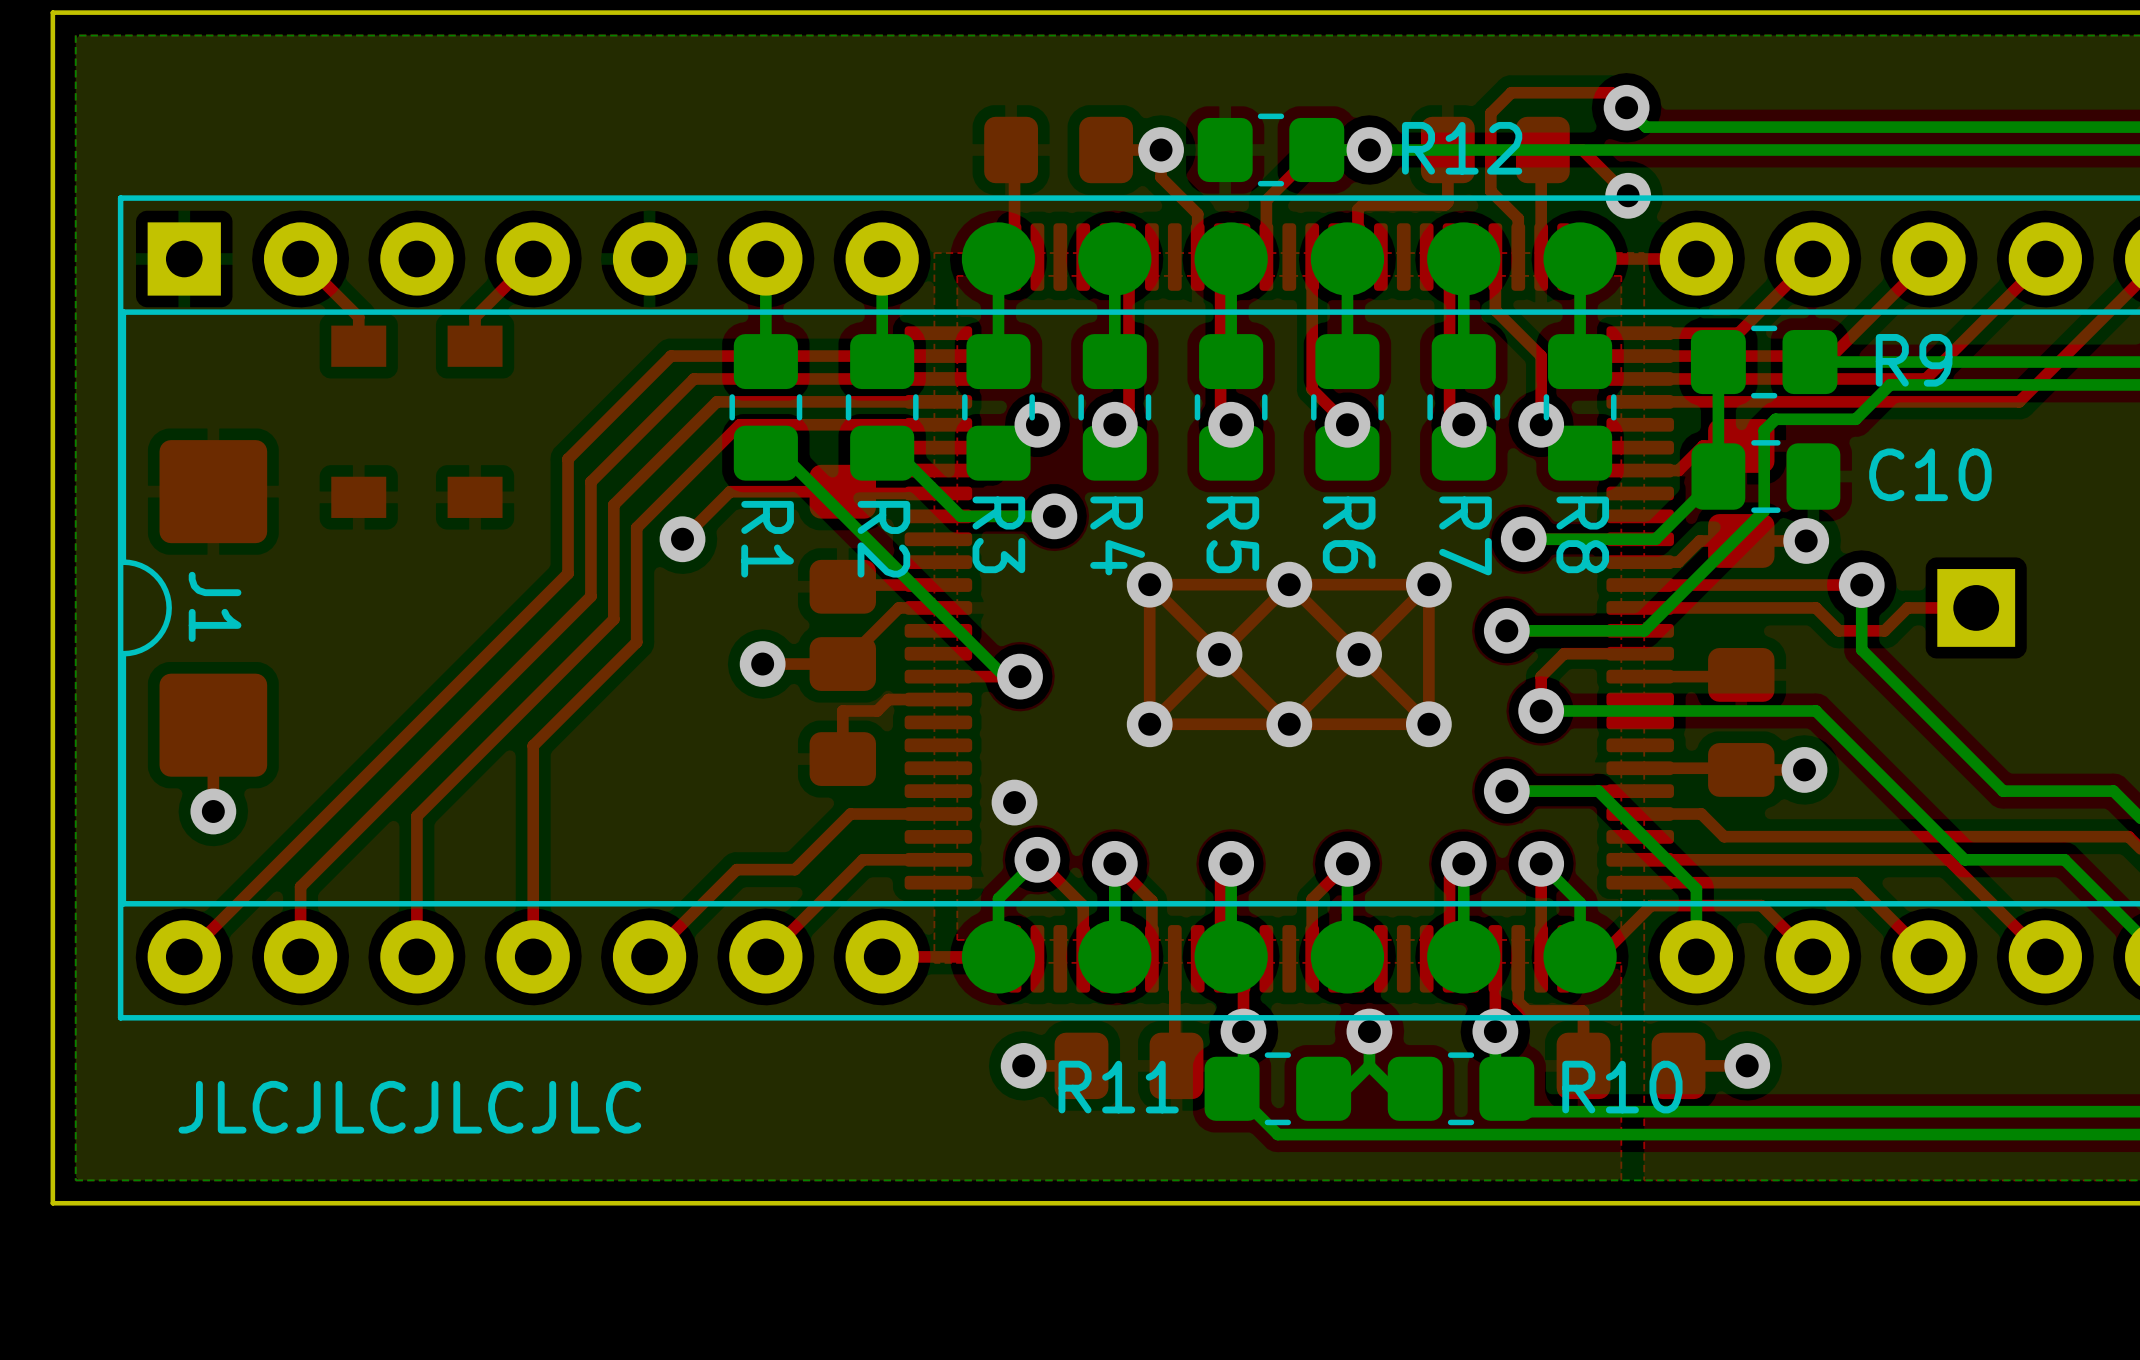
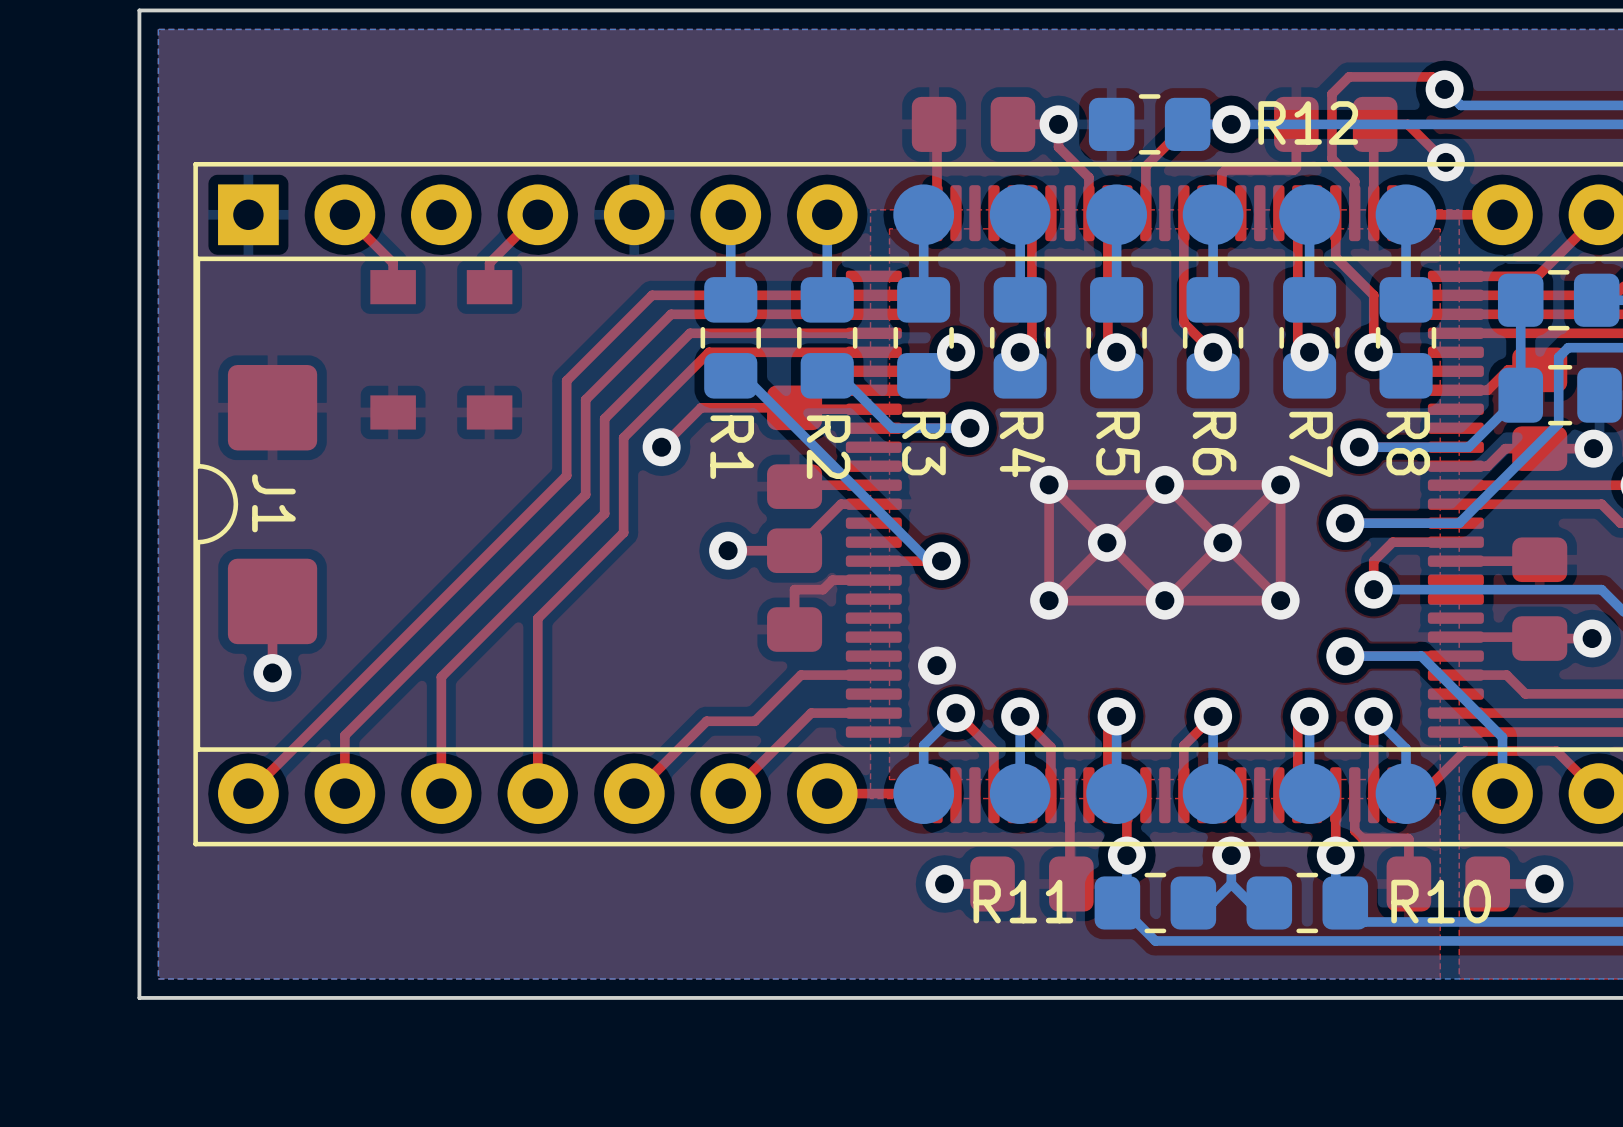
text: JLCJLCJLCJLC (409, 1107) -> none

